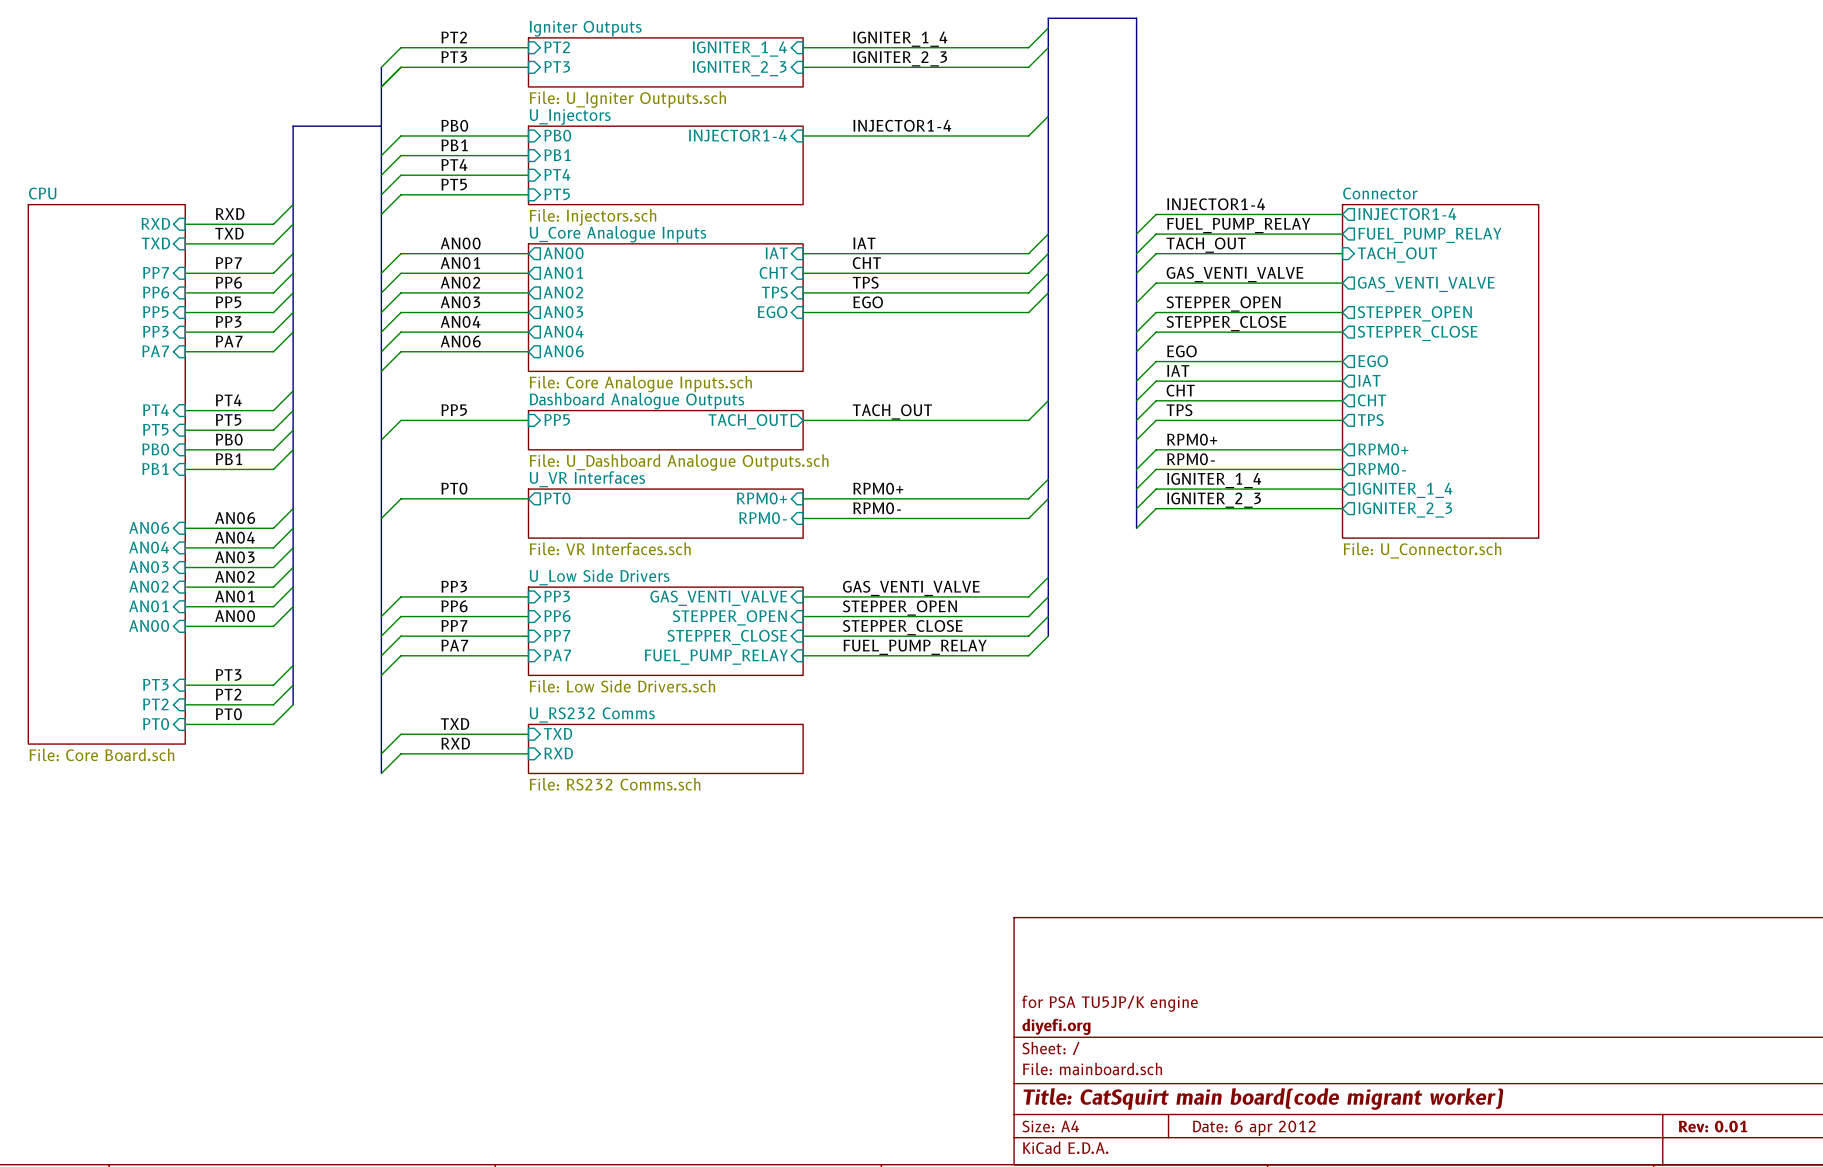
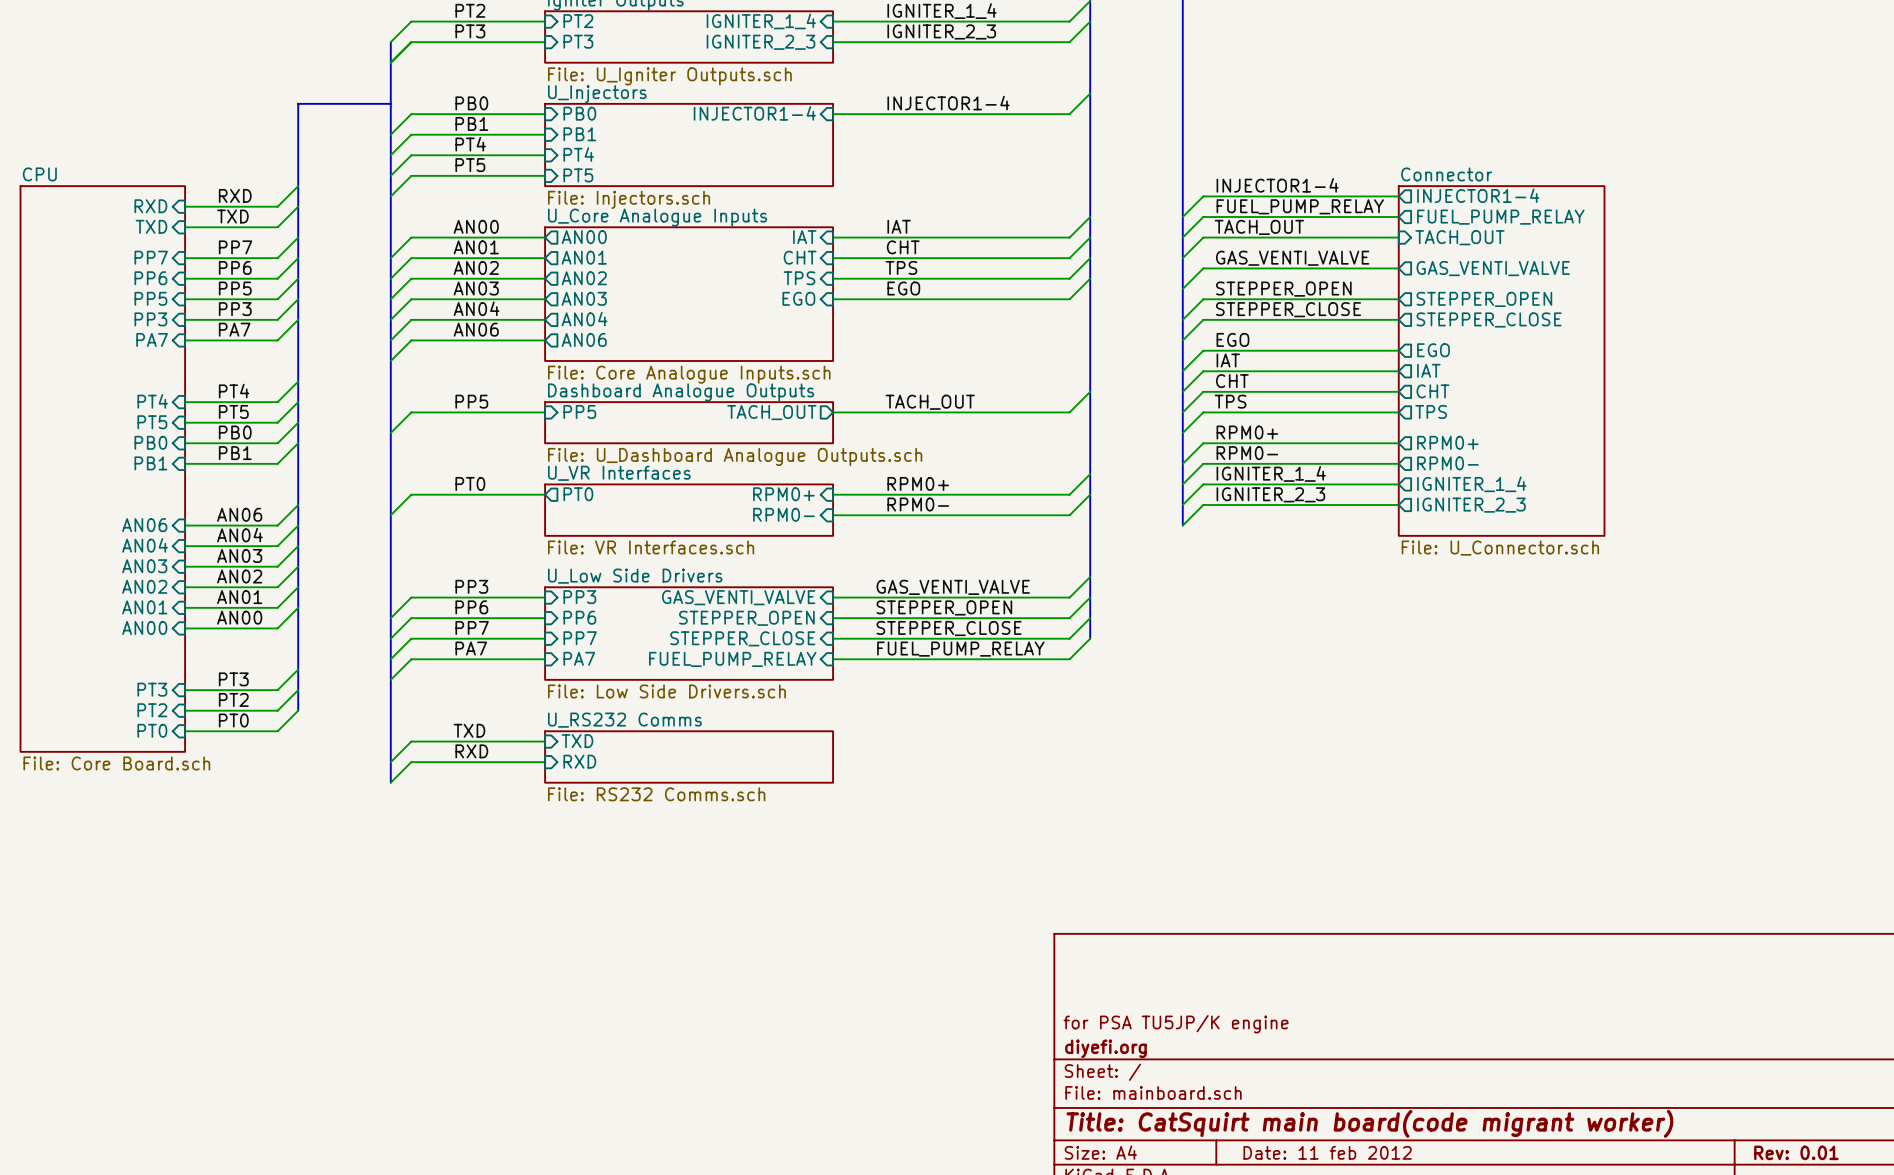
title block: Date: 6 apr 2012 (1254, 1128) -> Date: 11 feb 2012 (1327, 1152)

